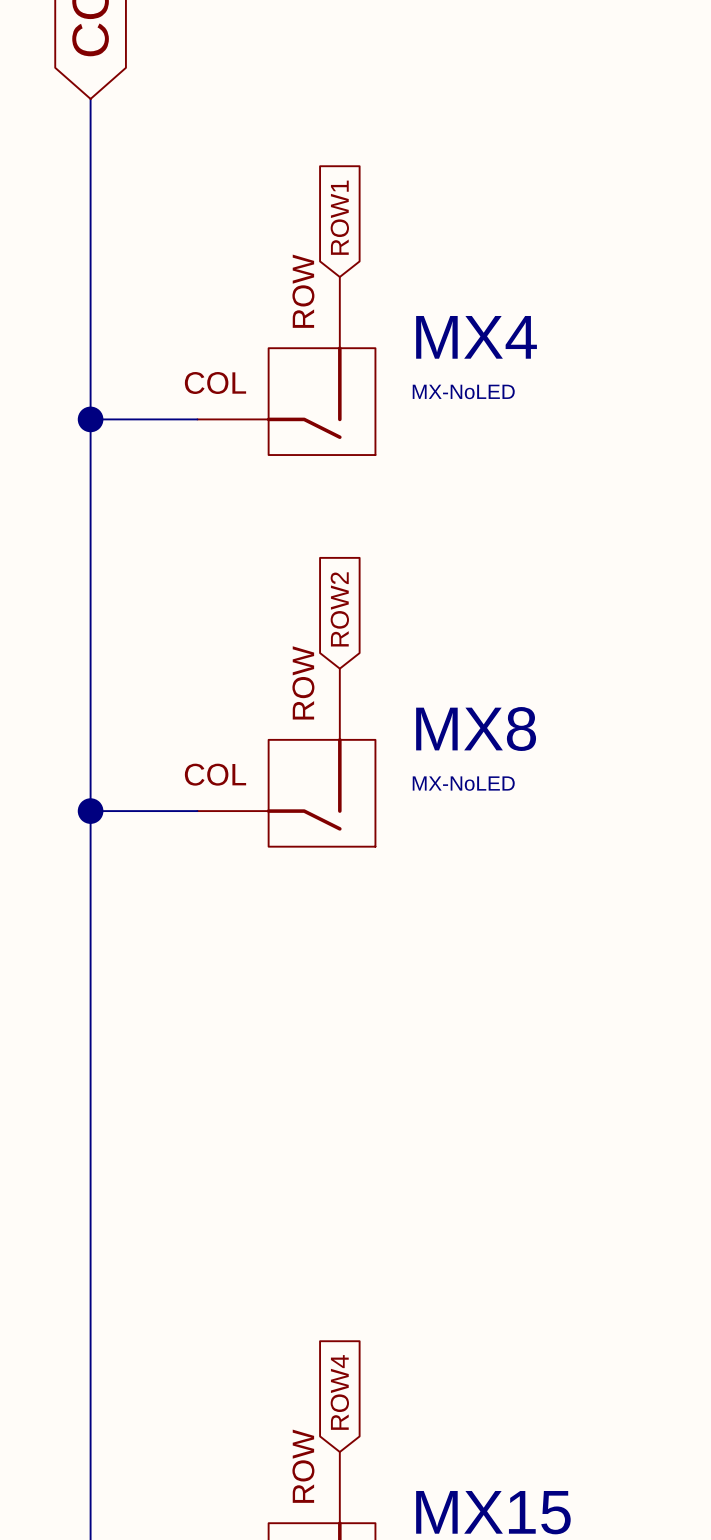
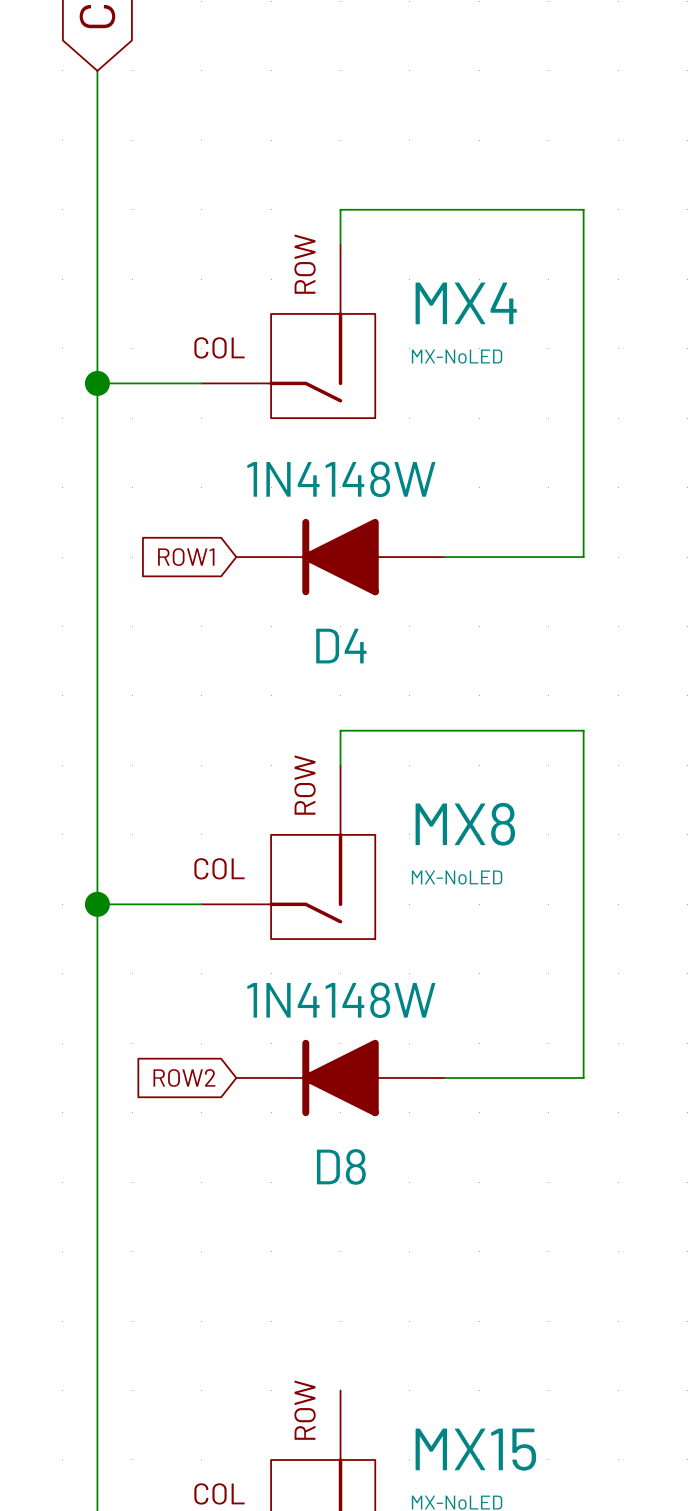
global label rotation: 0° (339, 217) -> 90° counterclockwise (186, 557)
global label position: ROW1 (339, 217) -> ROW1 (186, 557)
wire: none -> (340, 244) (340, 209) (583, 209) (583, 557) (444, 557)
D4: none -> 1N4148W (340, 557)
global label rotation: 0° (339, 609) -> 90° counterclockwise (184, 1077)
global label position: ROW2 (339, 609) -> ROW2 (184, 1077)
MX8 position: (286, 757) -> (288, 852)
wire: (90, 811) (197, 811) -> (97, 904) (201, 904)
junction position: (90, 811) -> (97, 904)
wire: none -> (340, 765) (340, 730) (583, 730) (583, 1077) (444, 1077)
D8: none -> 1N4148W (340, 1077)
global label: ROW4 (339, 1392) -> none

